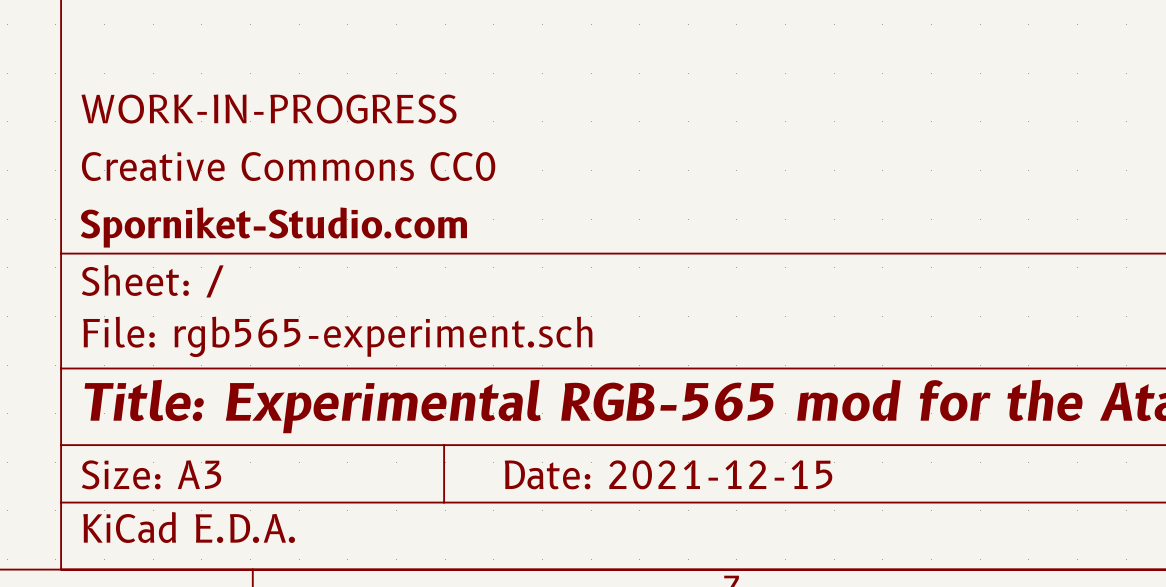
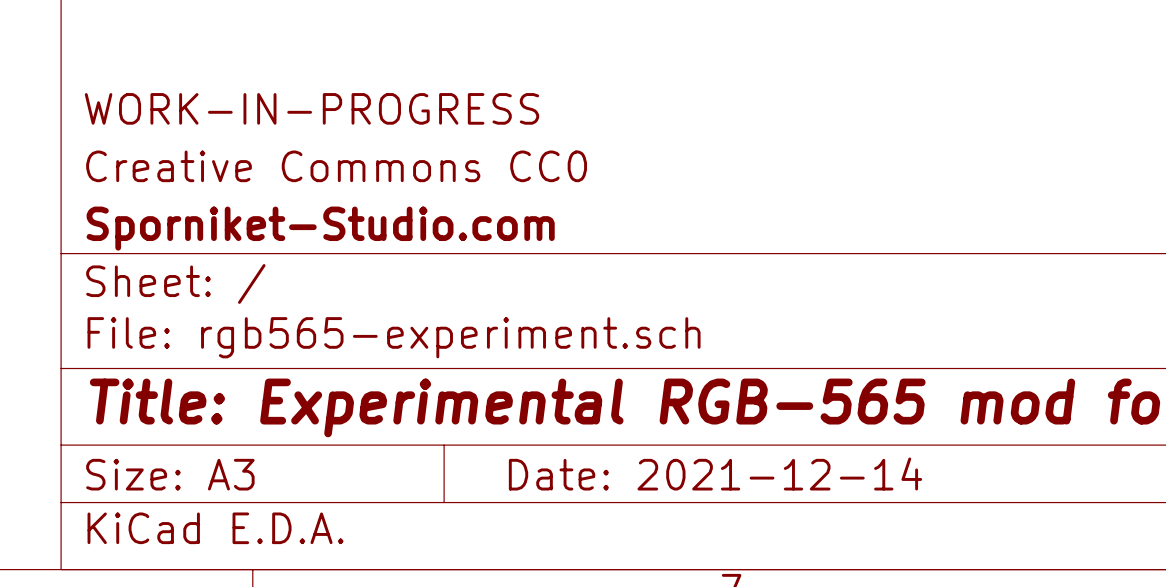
title block: Date: 2021-12-15 (668, 474) -> Date: 2021-12-14 (715, 473)

